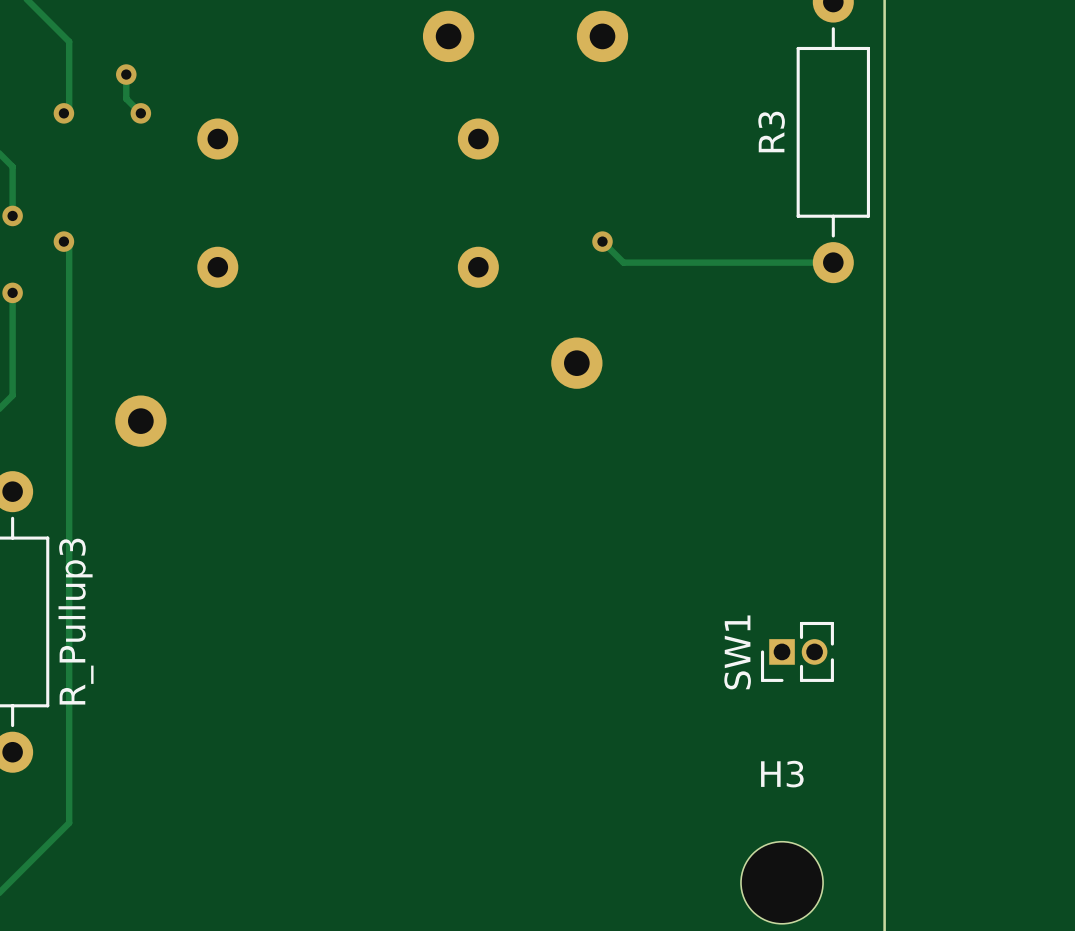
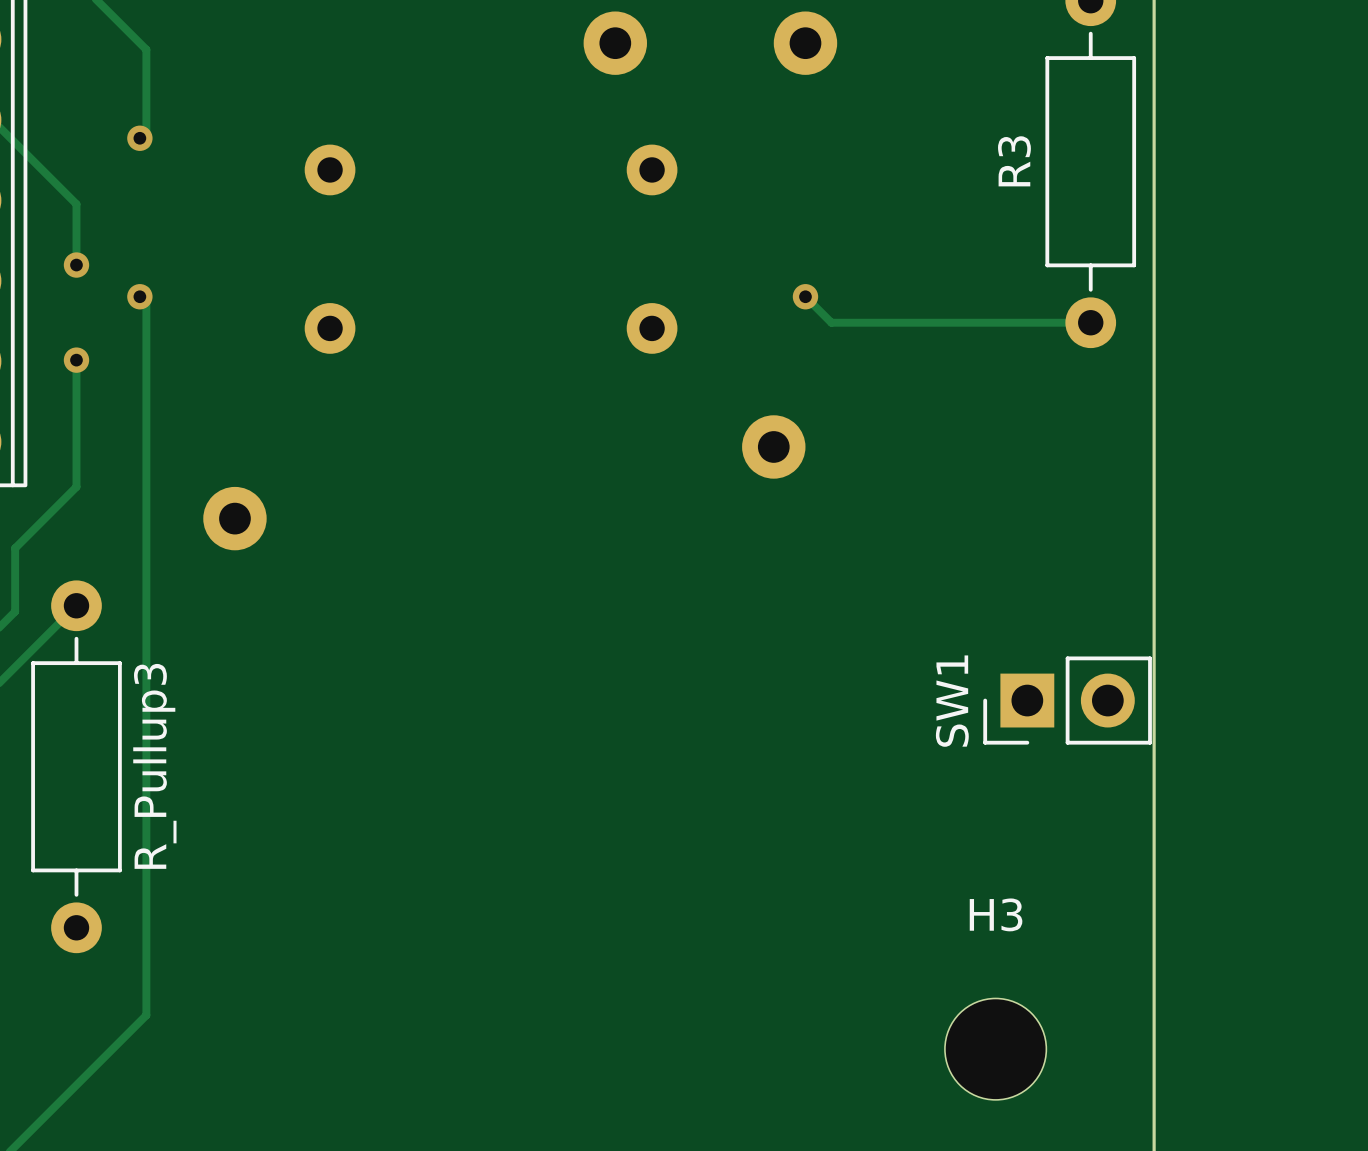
track: (126, 74) (126, 98) (140, 113) -> none
via: (126, 74) -> none
via: (140, 113) -> none
SW1 footprint: [760, 621, 834, 682] -> [983, 656, 1152, 745]
H3 position: (782, 882) -> (995, 1049)

